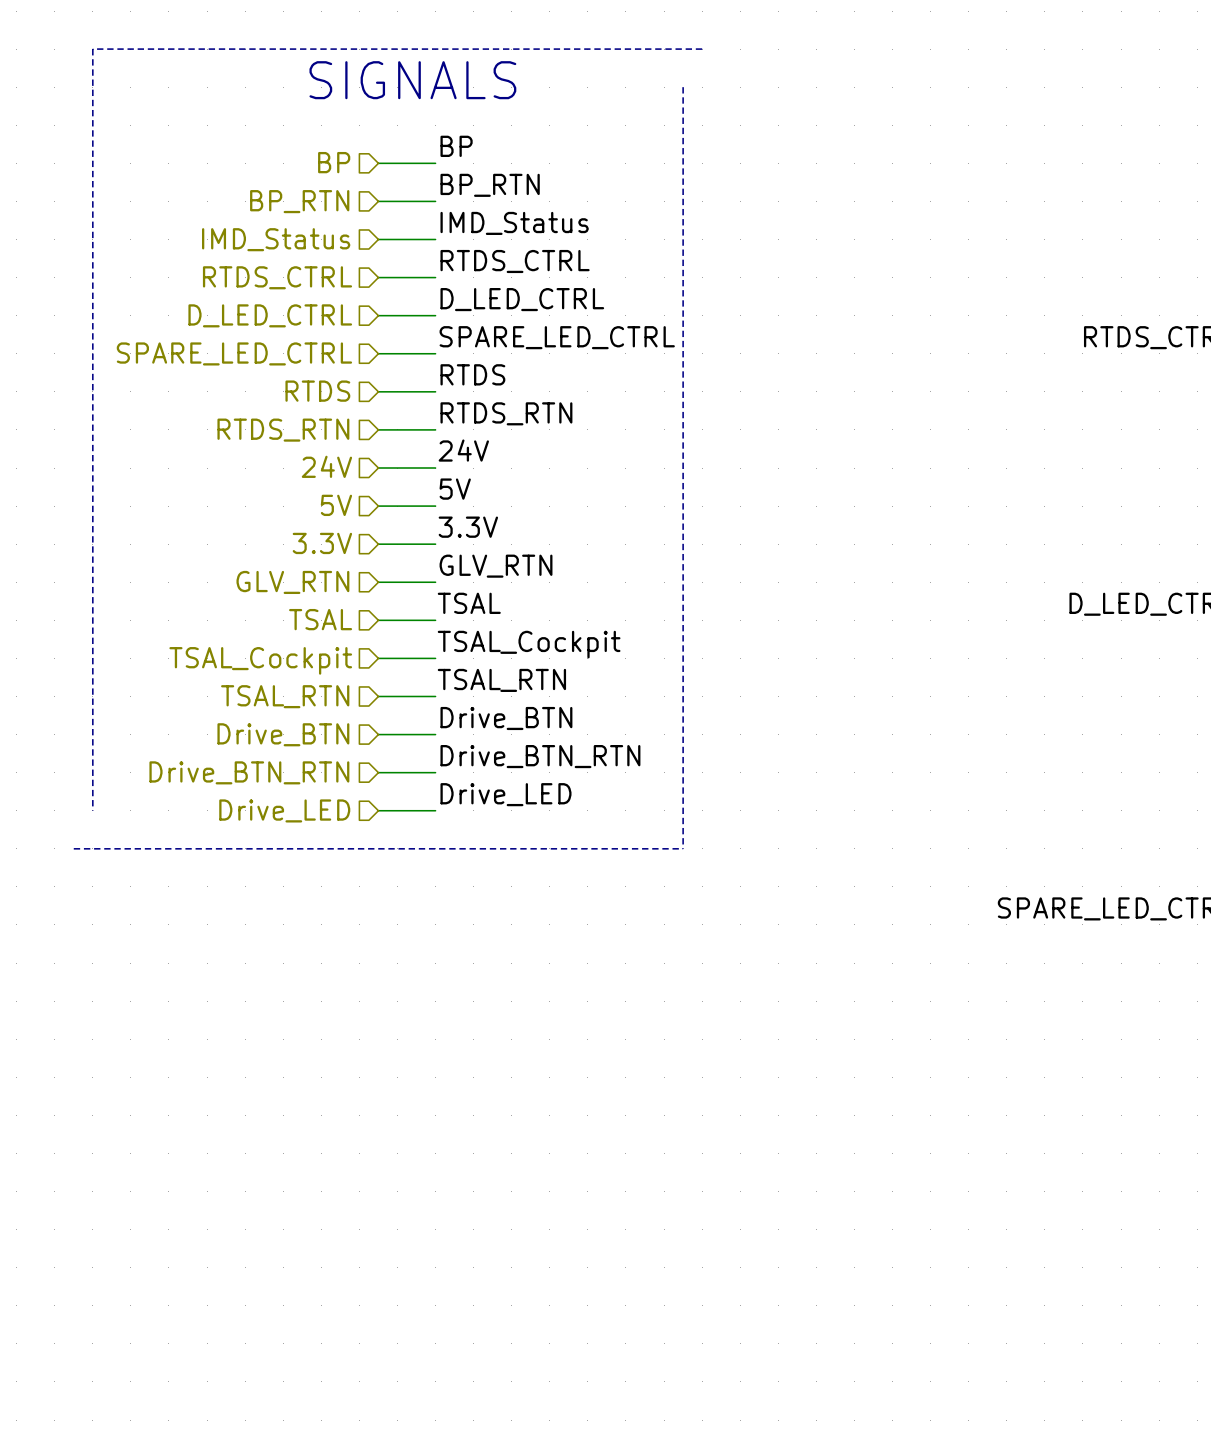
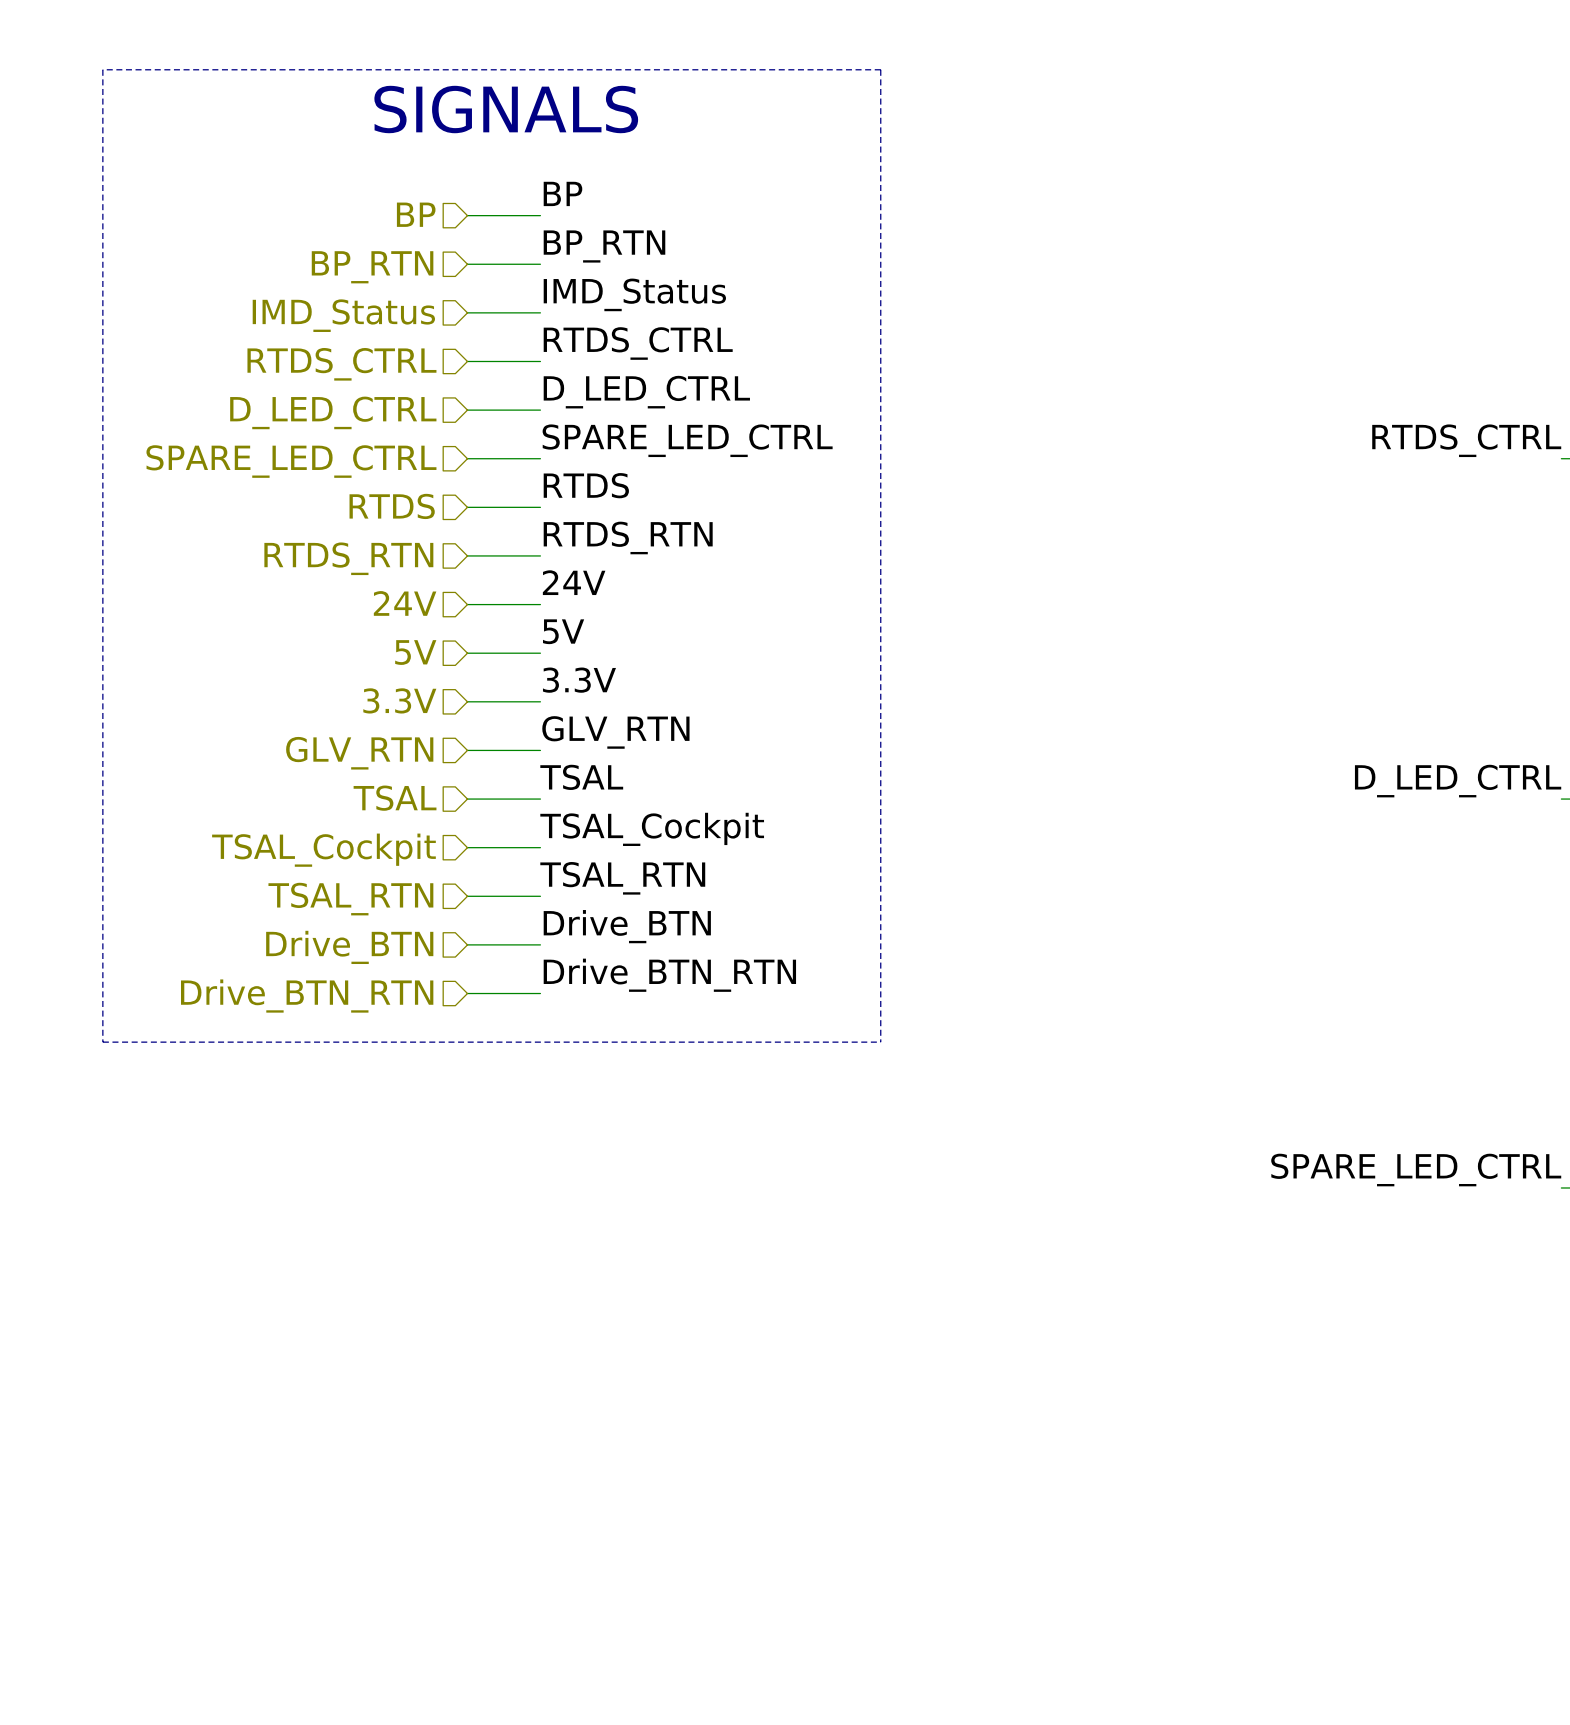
line: (683, 87) (683, 848) (73, 848) -> (880, 69) (880, 1042) (102, 1042)
label: Drive_LED (505, 794) -> none
hierarchical label: Drive_LED (284, 810) -> none

